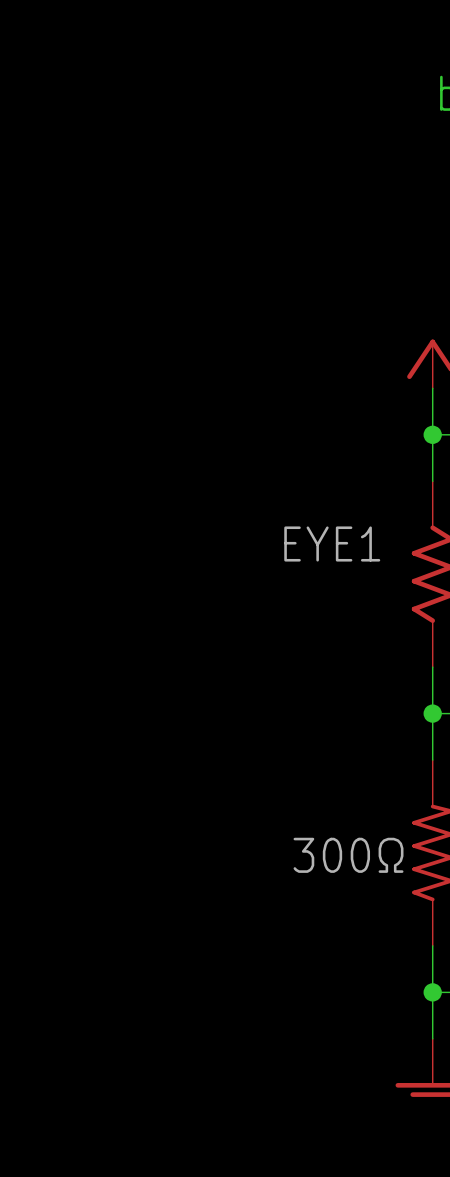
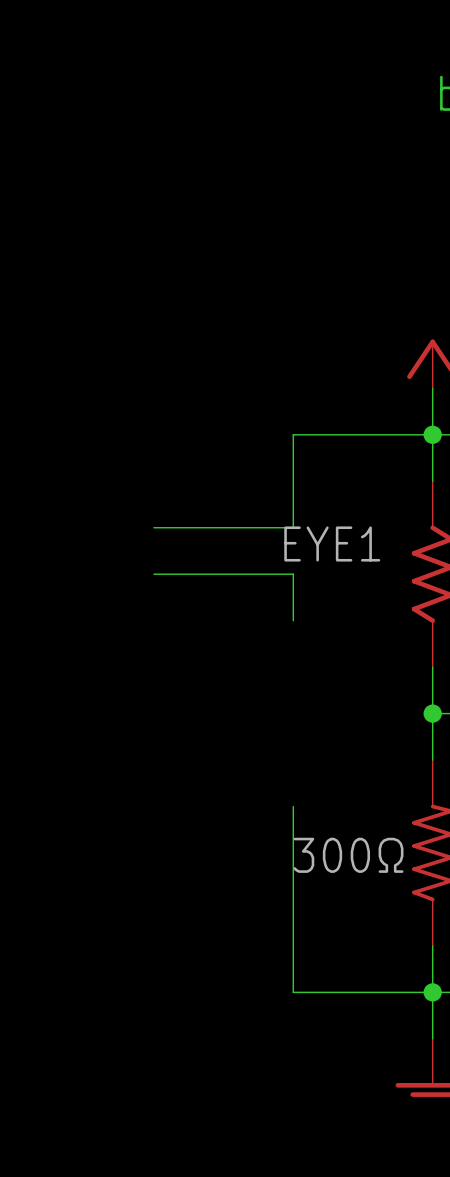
wire: none -> (432, 434) (293, 434) (293, 527) (153, 527)
wire: none -> (153, 574) (293, 574) (293, 620)
wire: none -> (293, 806) (293, 992) (432, 992)

